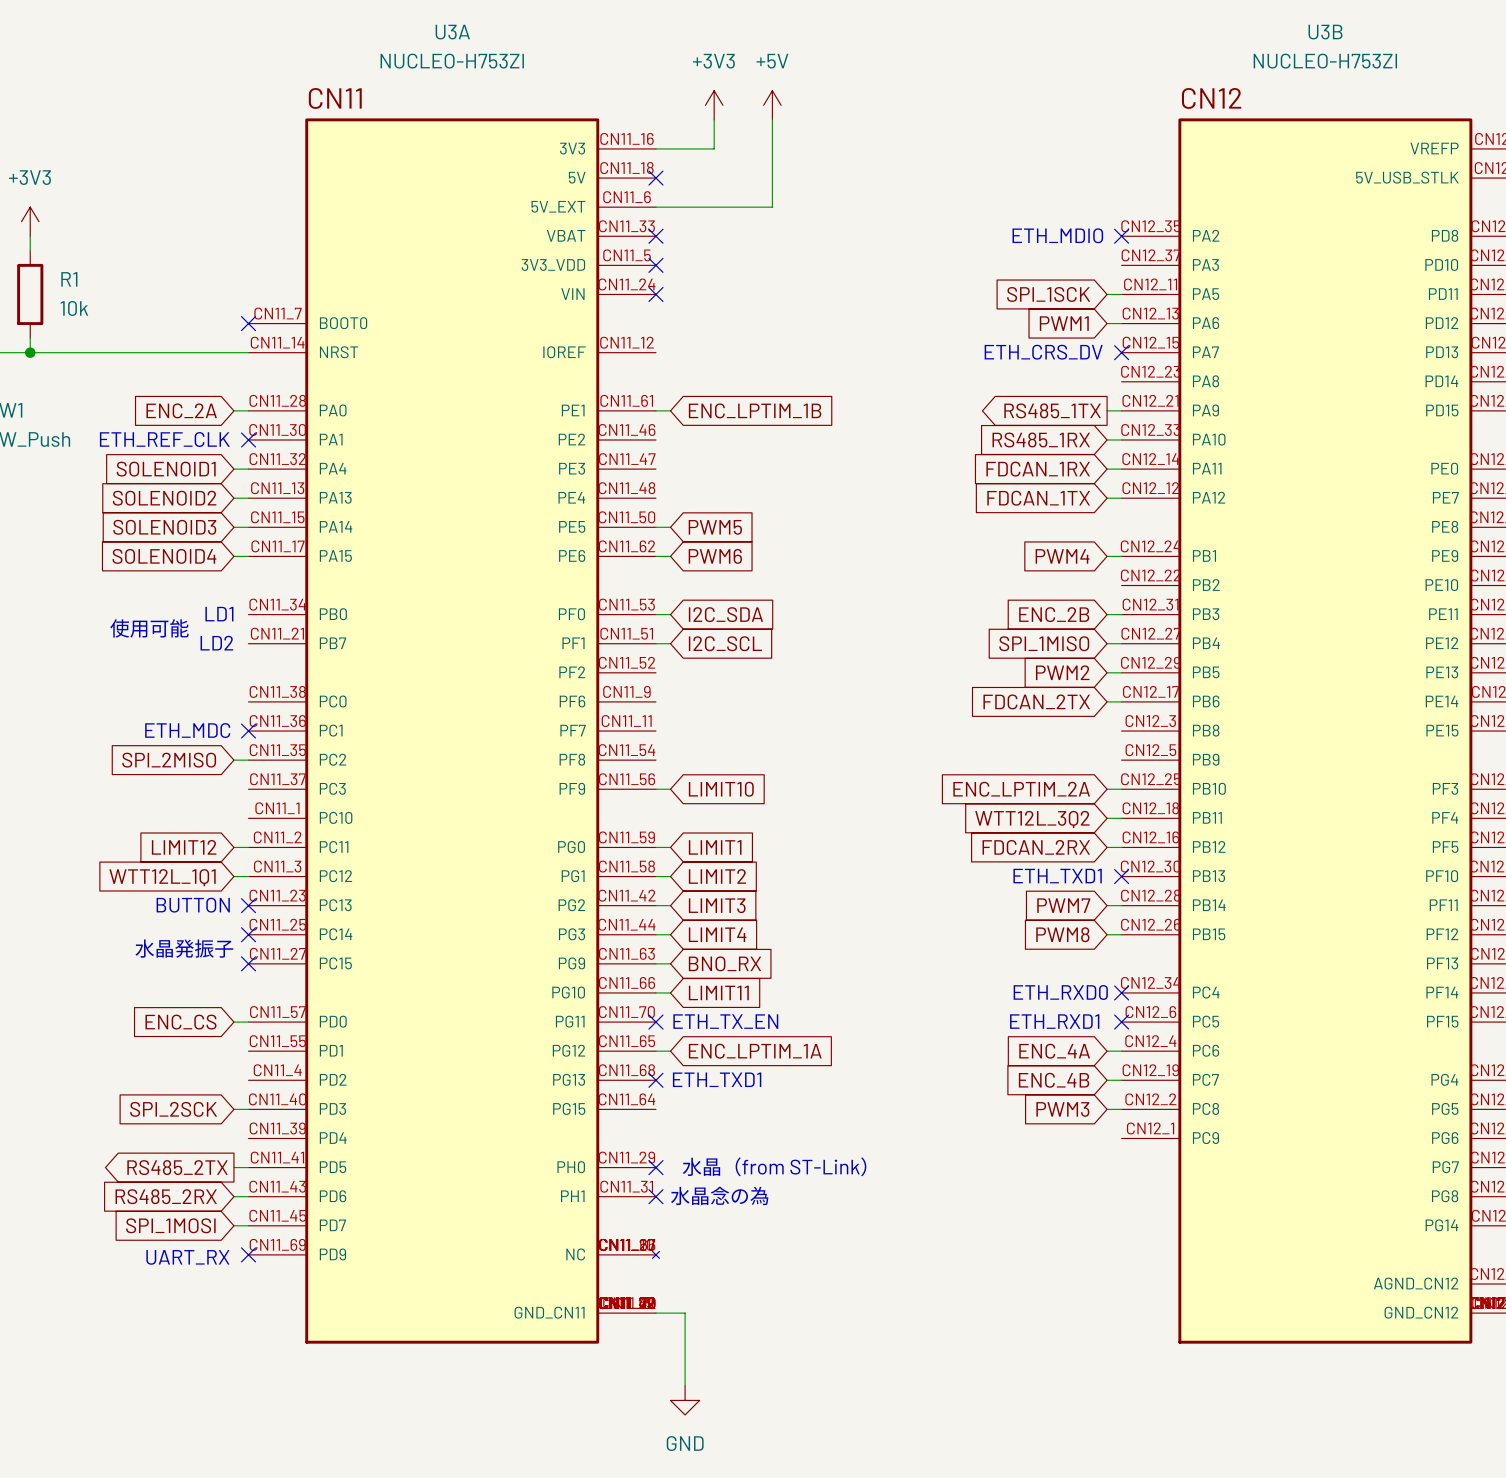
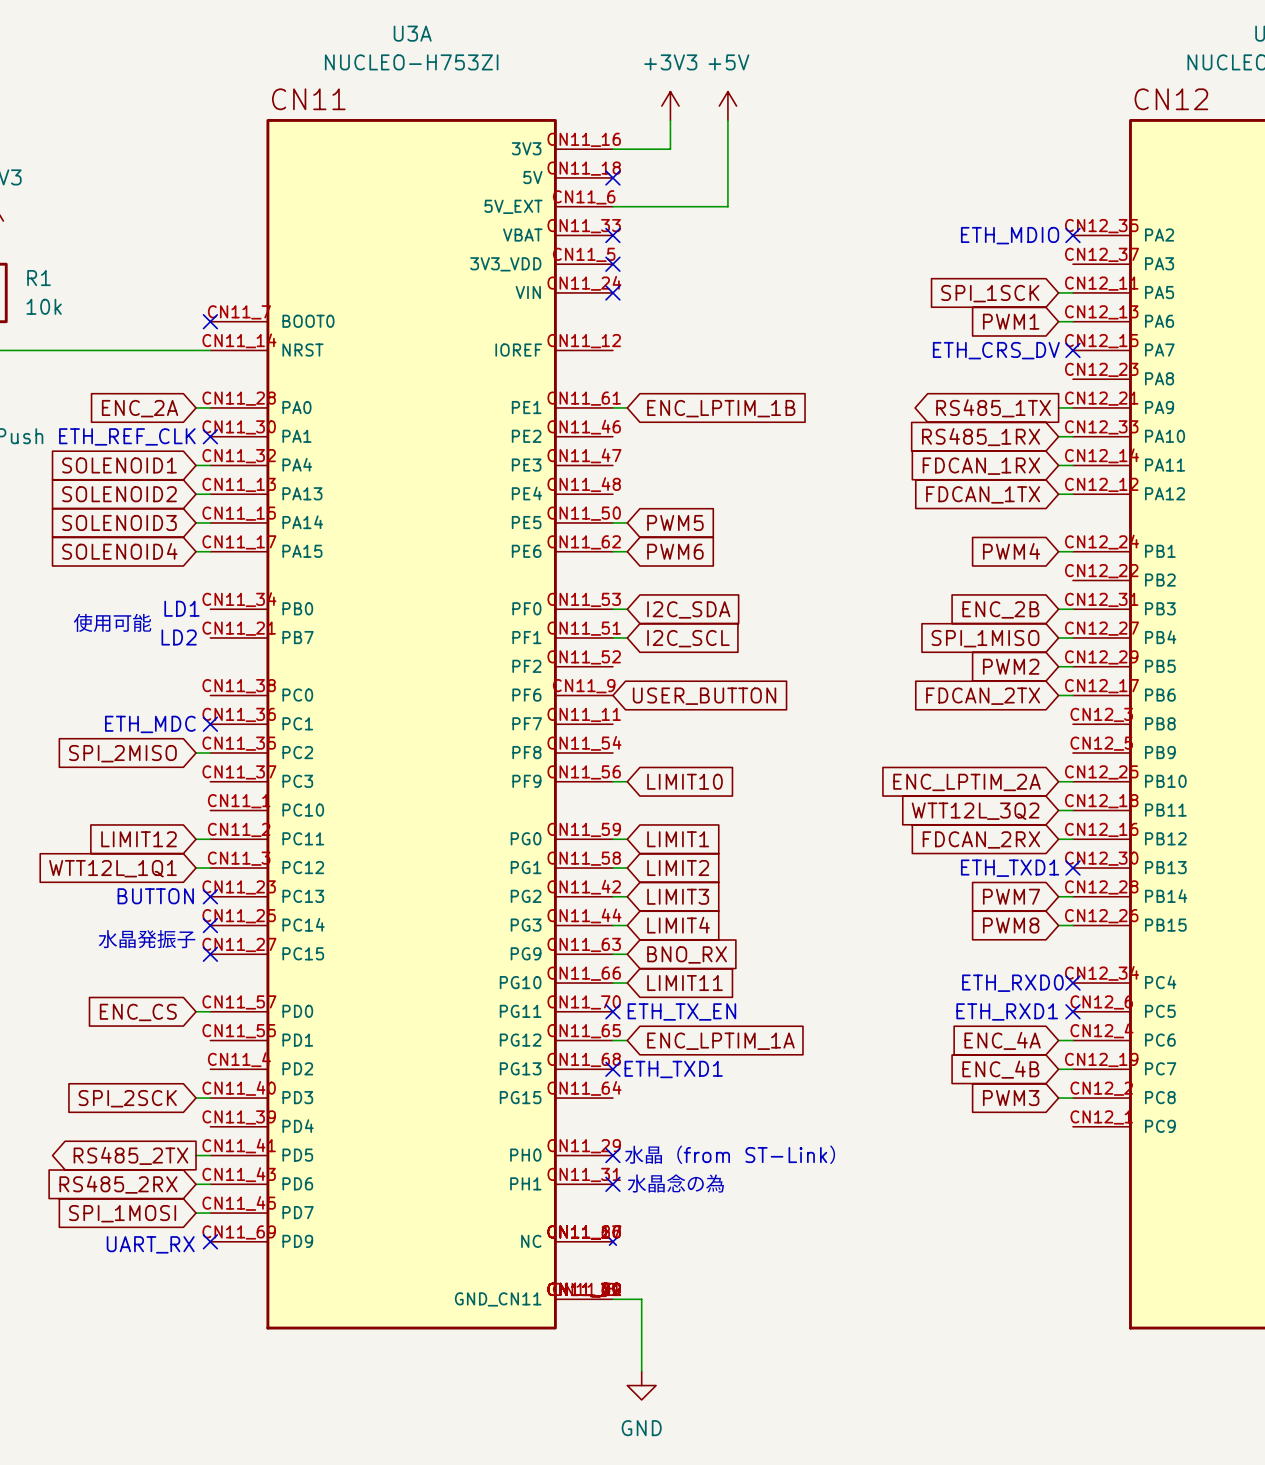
global label: none -> USER_BUTTON (704, 696)

